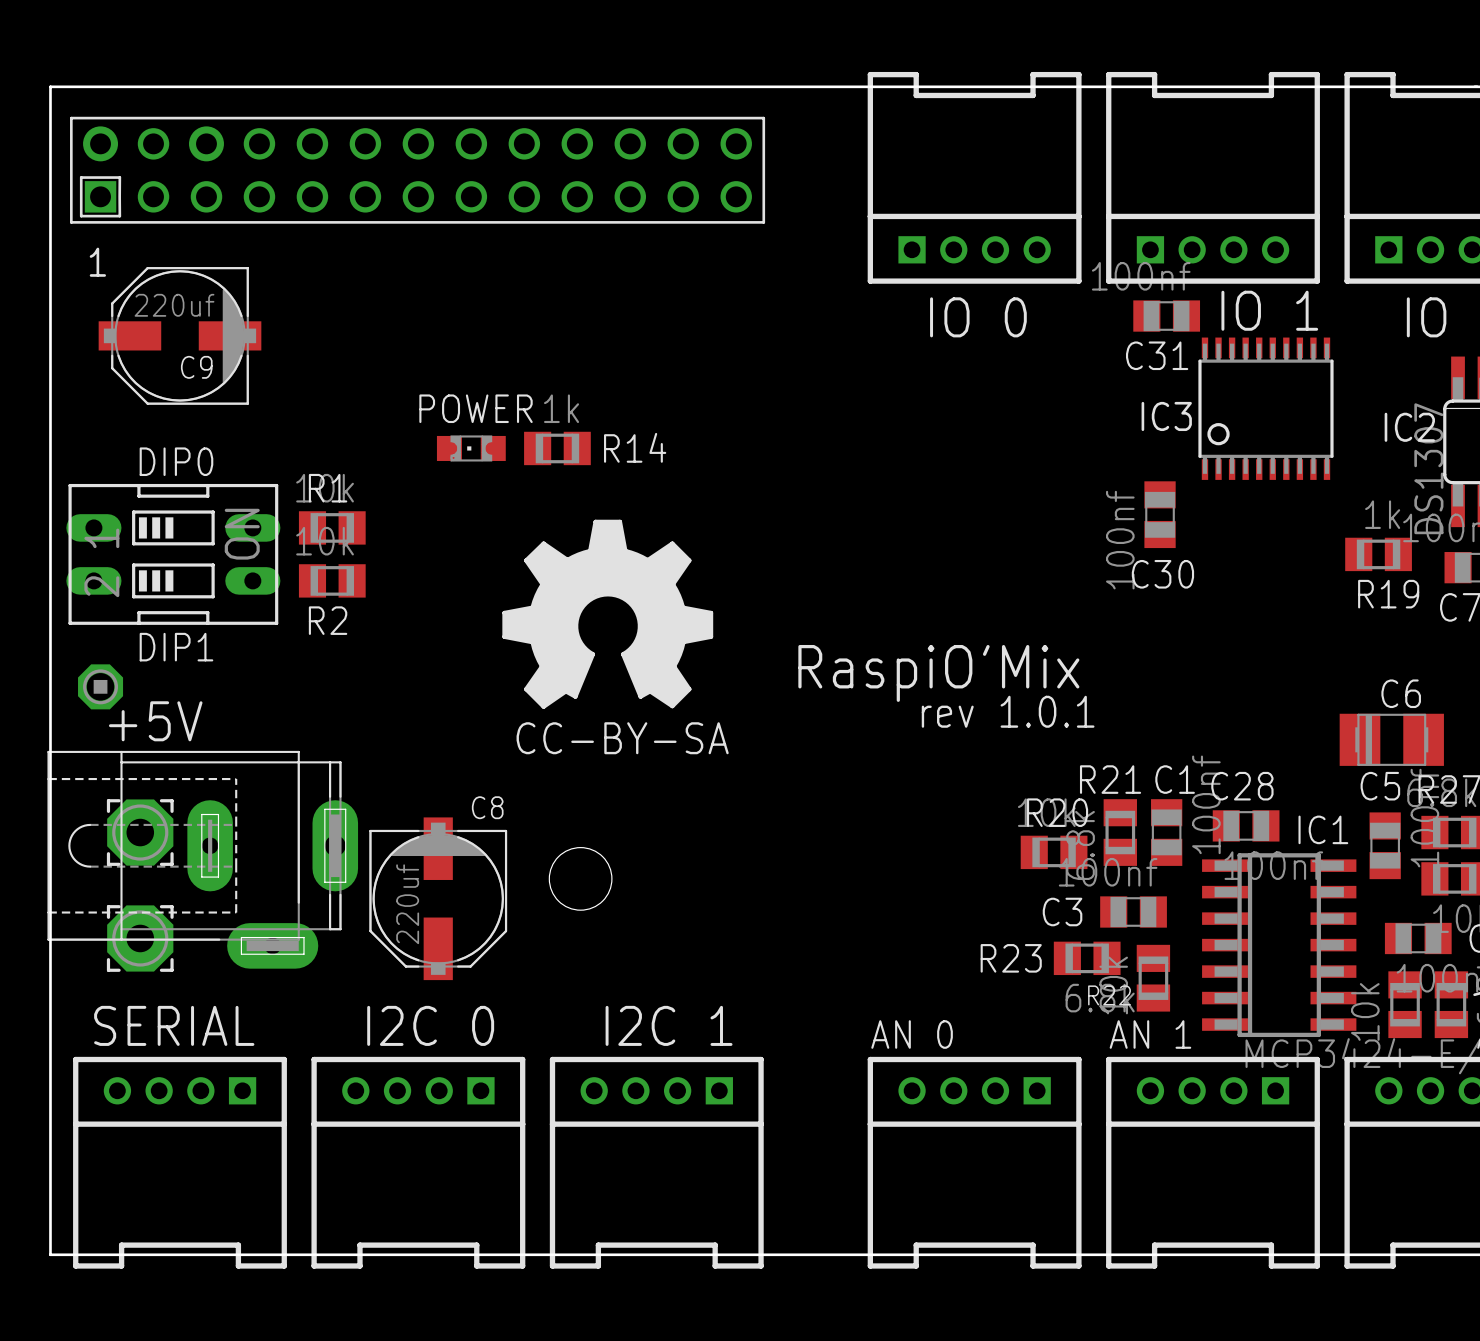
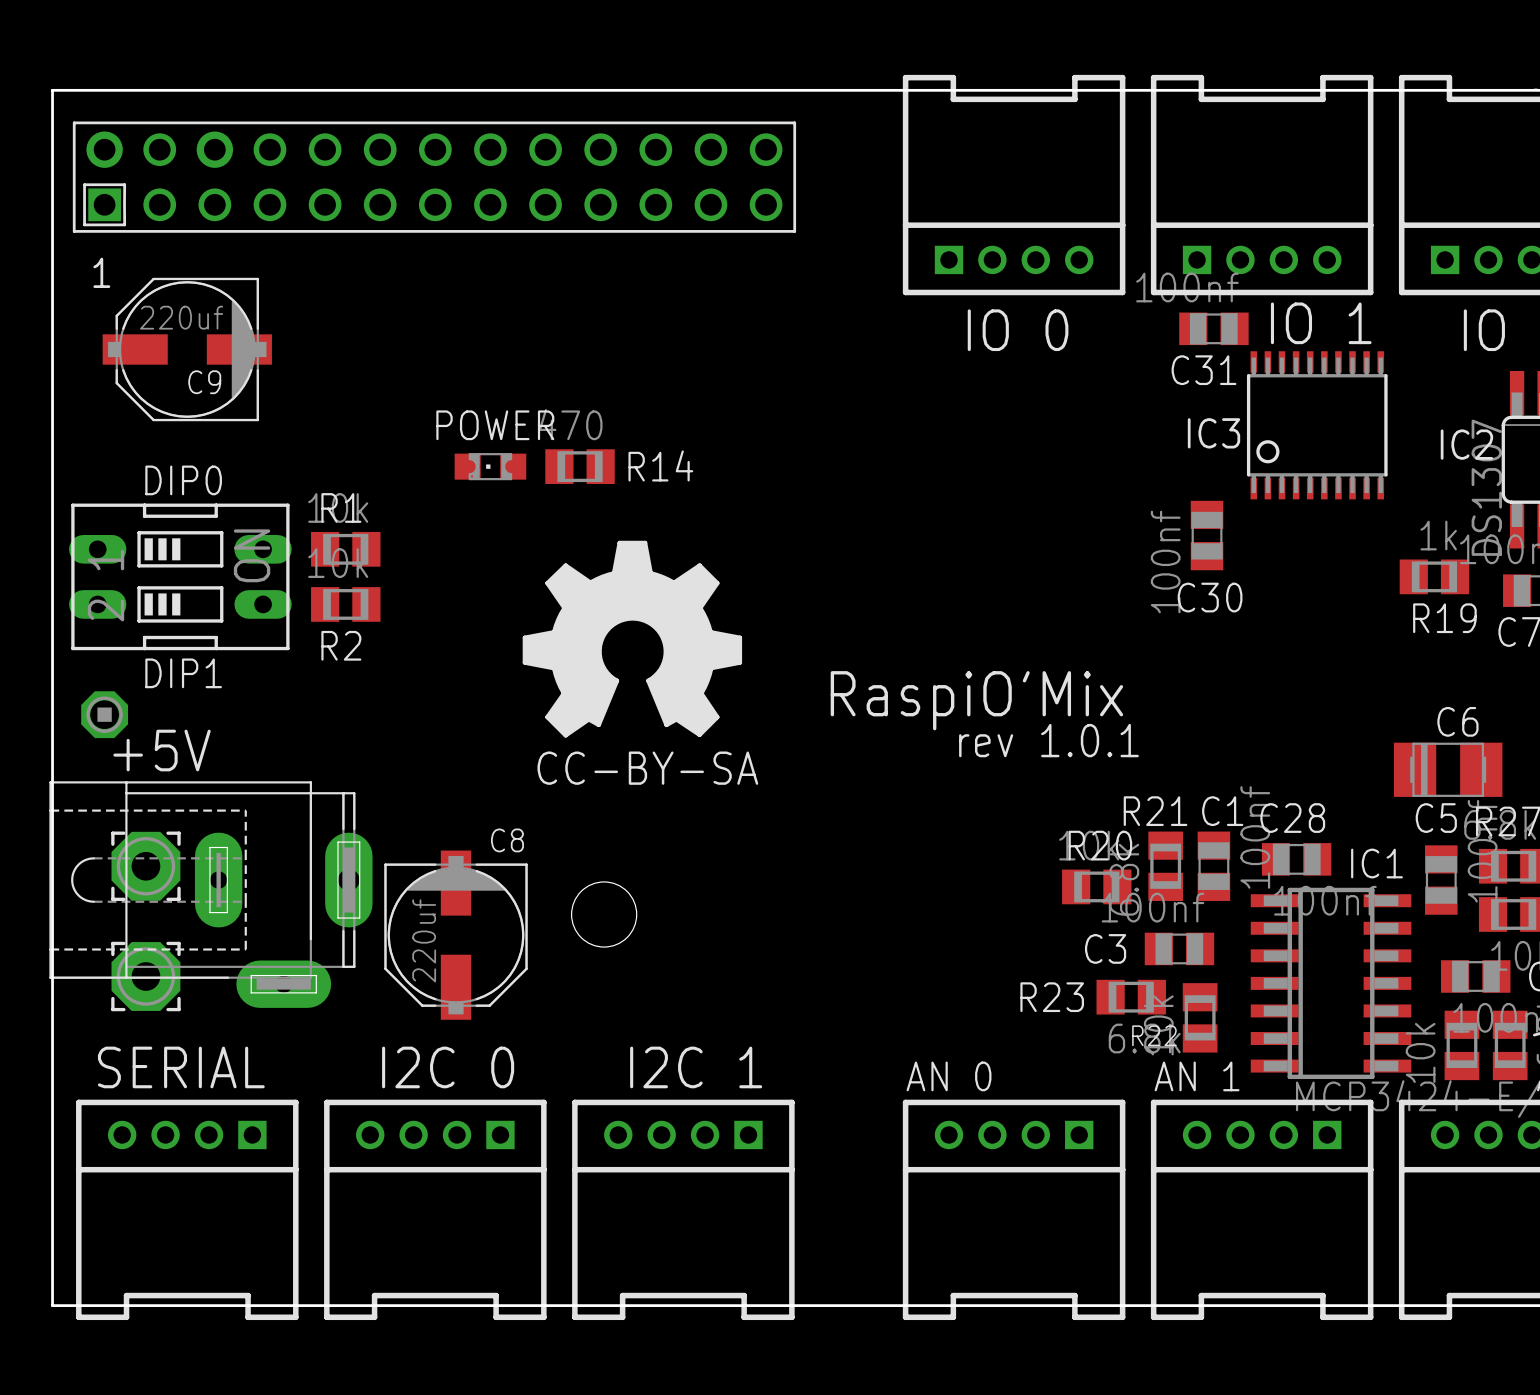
R14 value: 1k (561, 408) -> 470 (570, 424)

